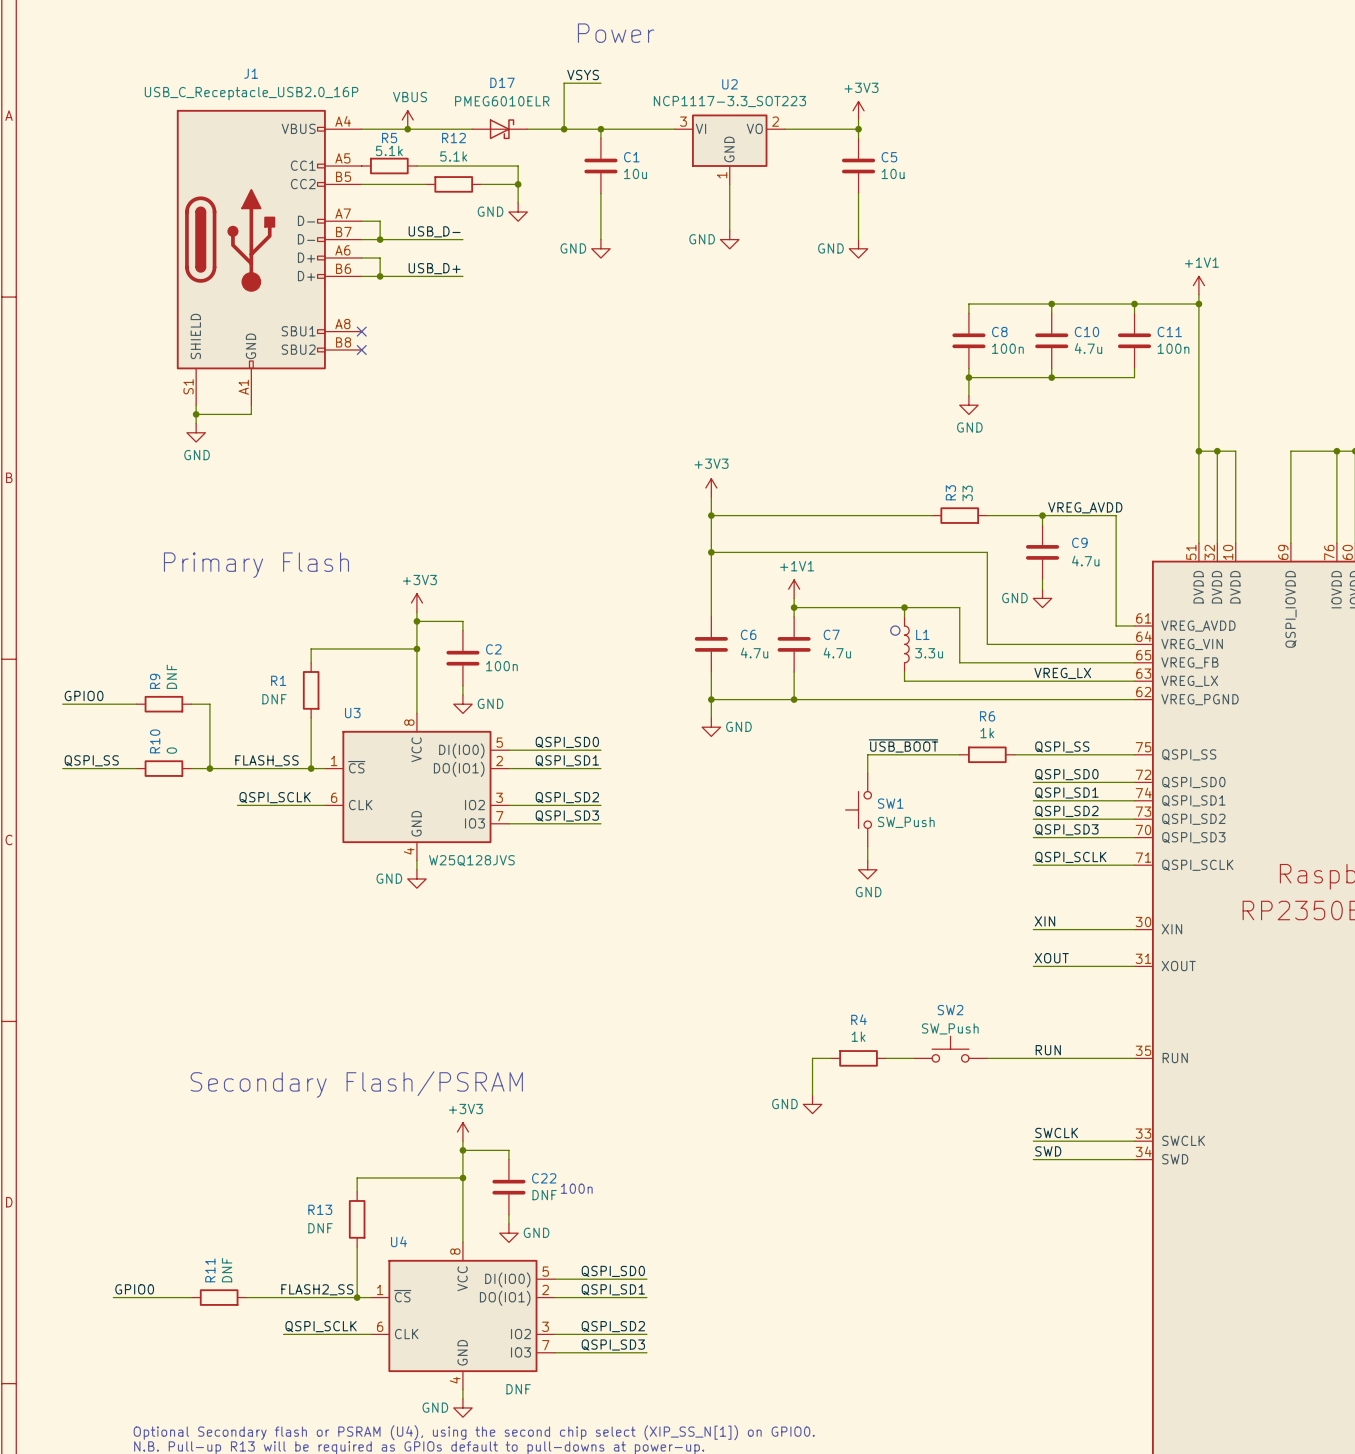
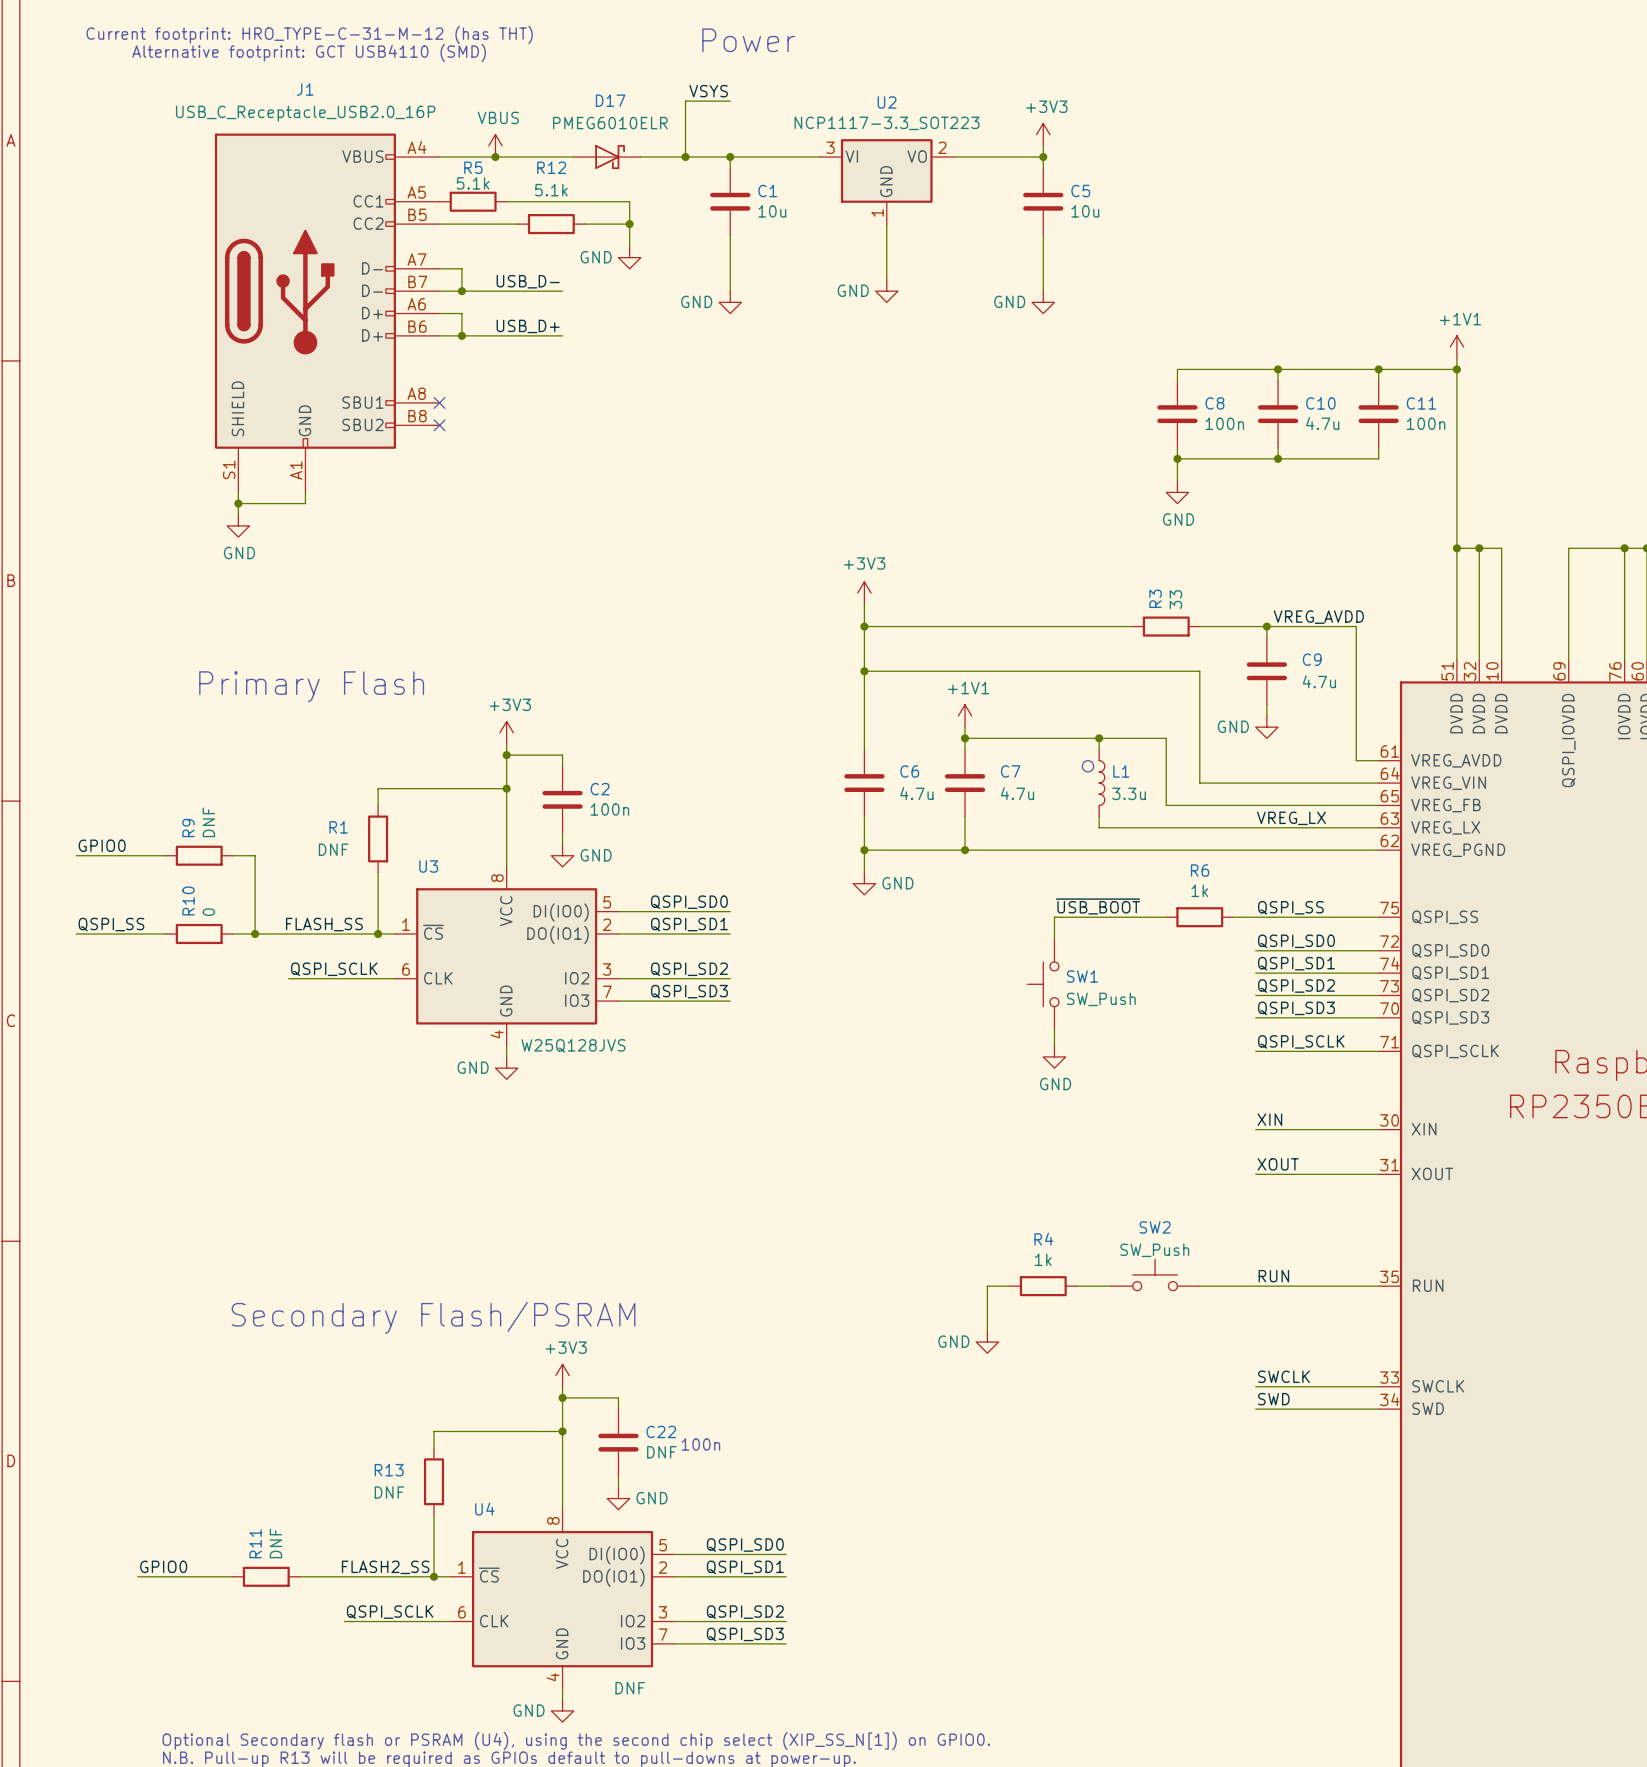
text: none -> Current footprint: HRO_TYPE-C-31-M-12 (has THT) (309, 34)
text: none -> Alternative footprint: GCT USB4110 (SMD) (309, 52)

